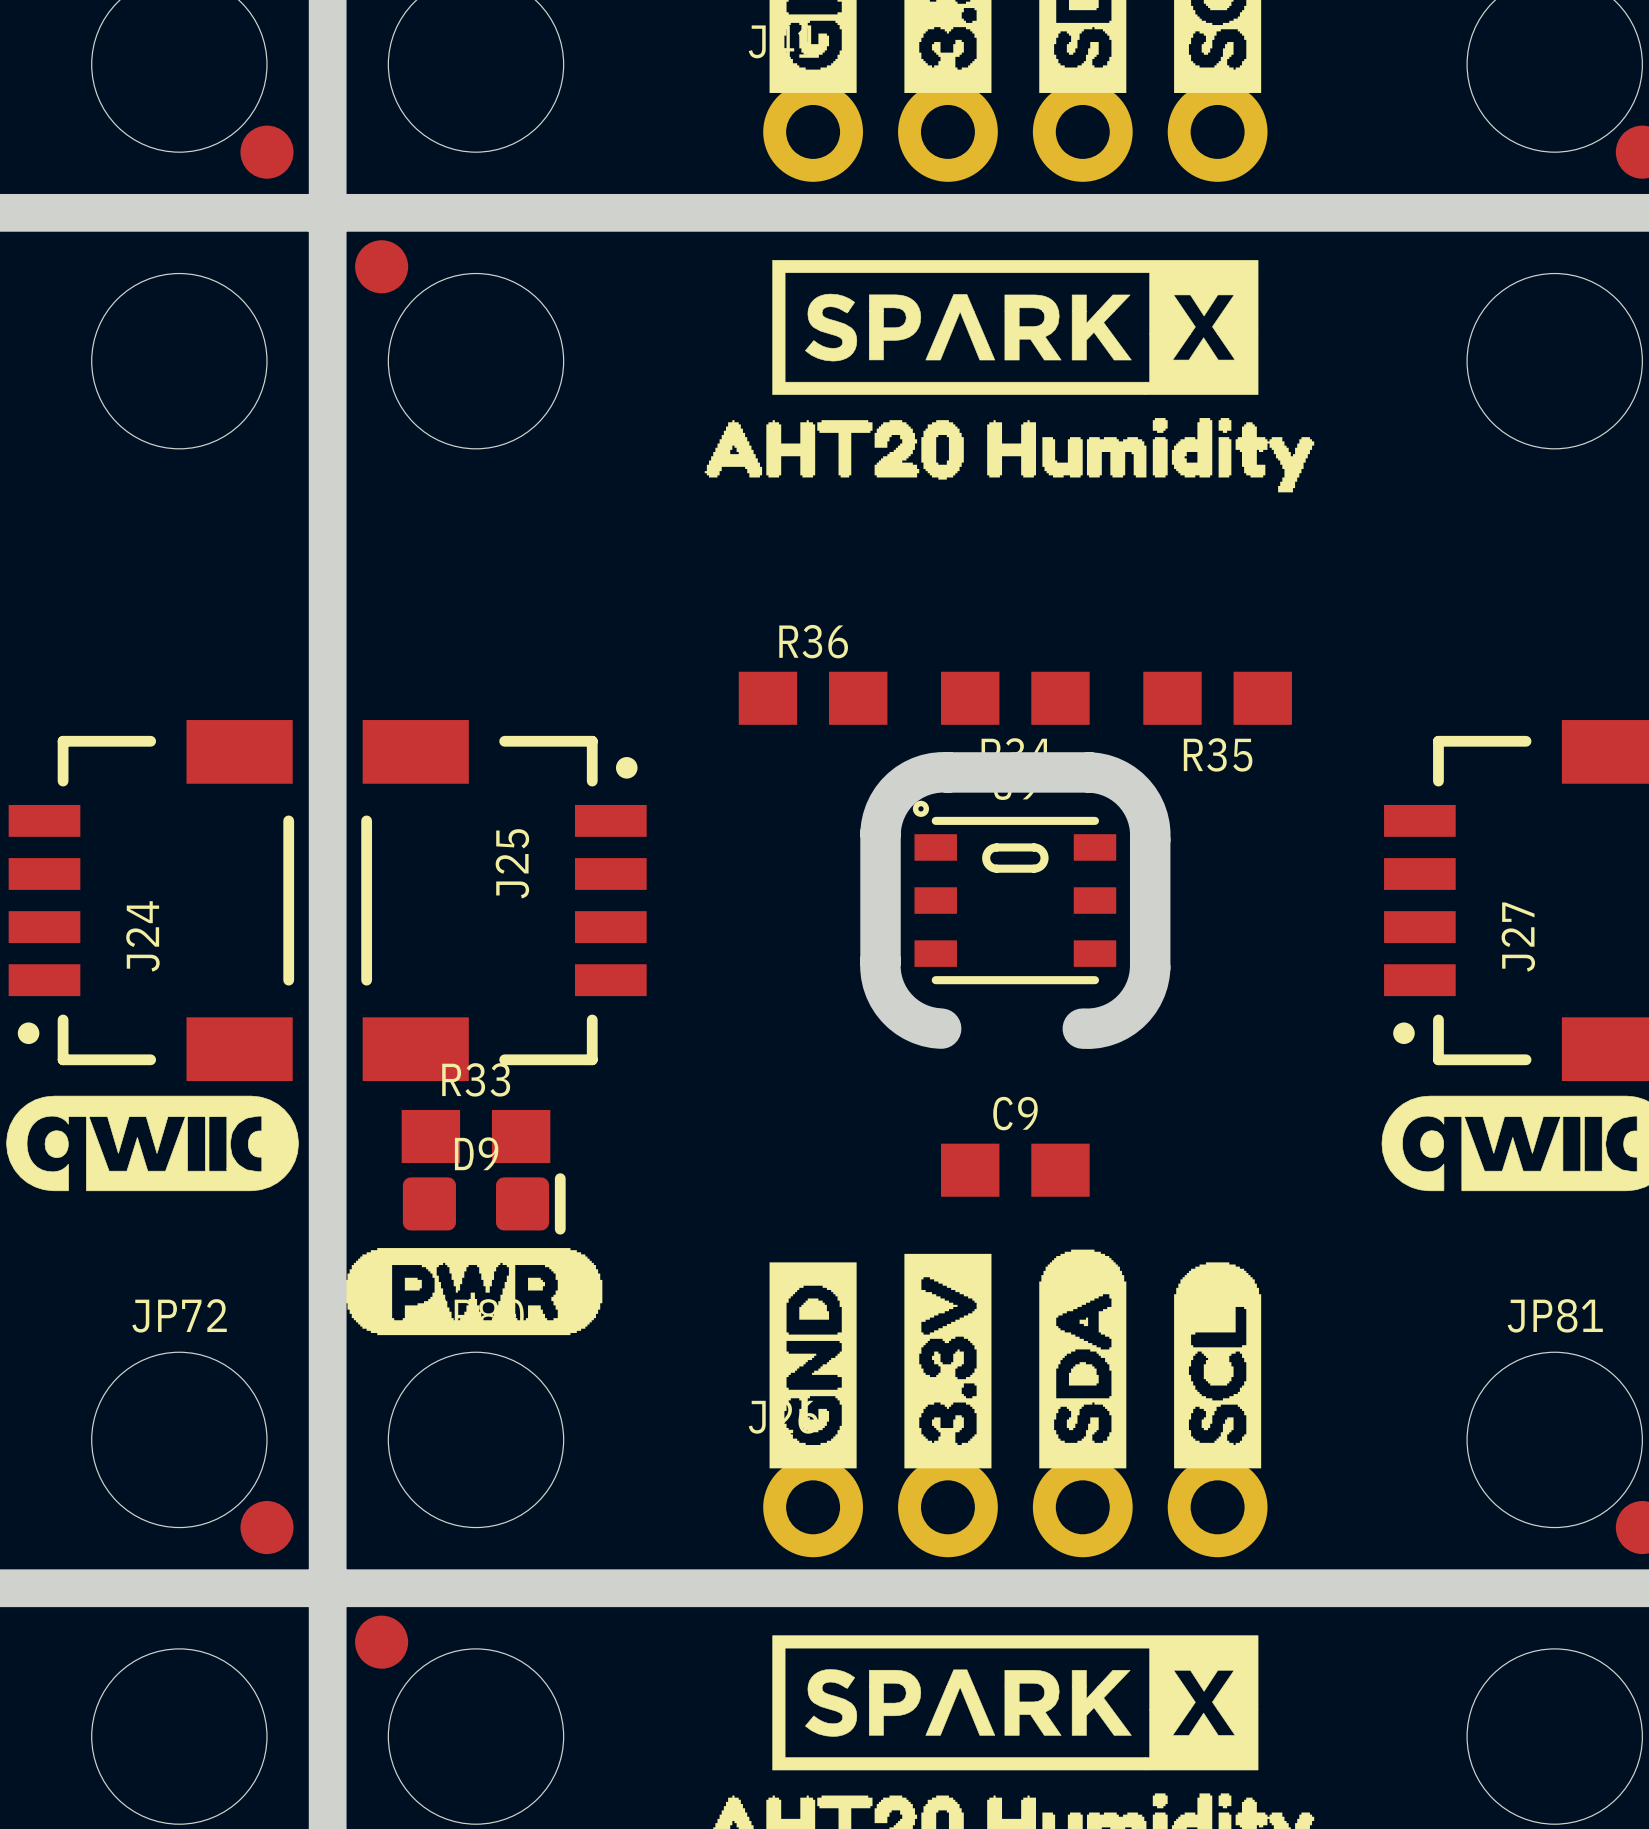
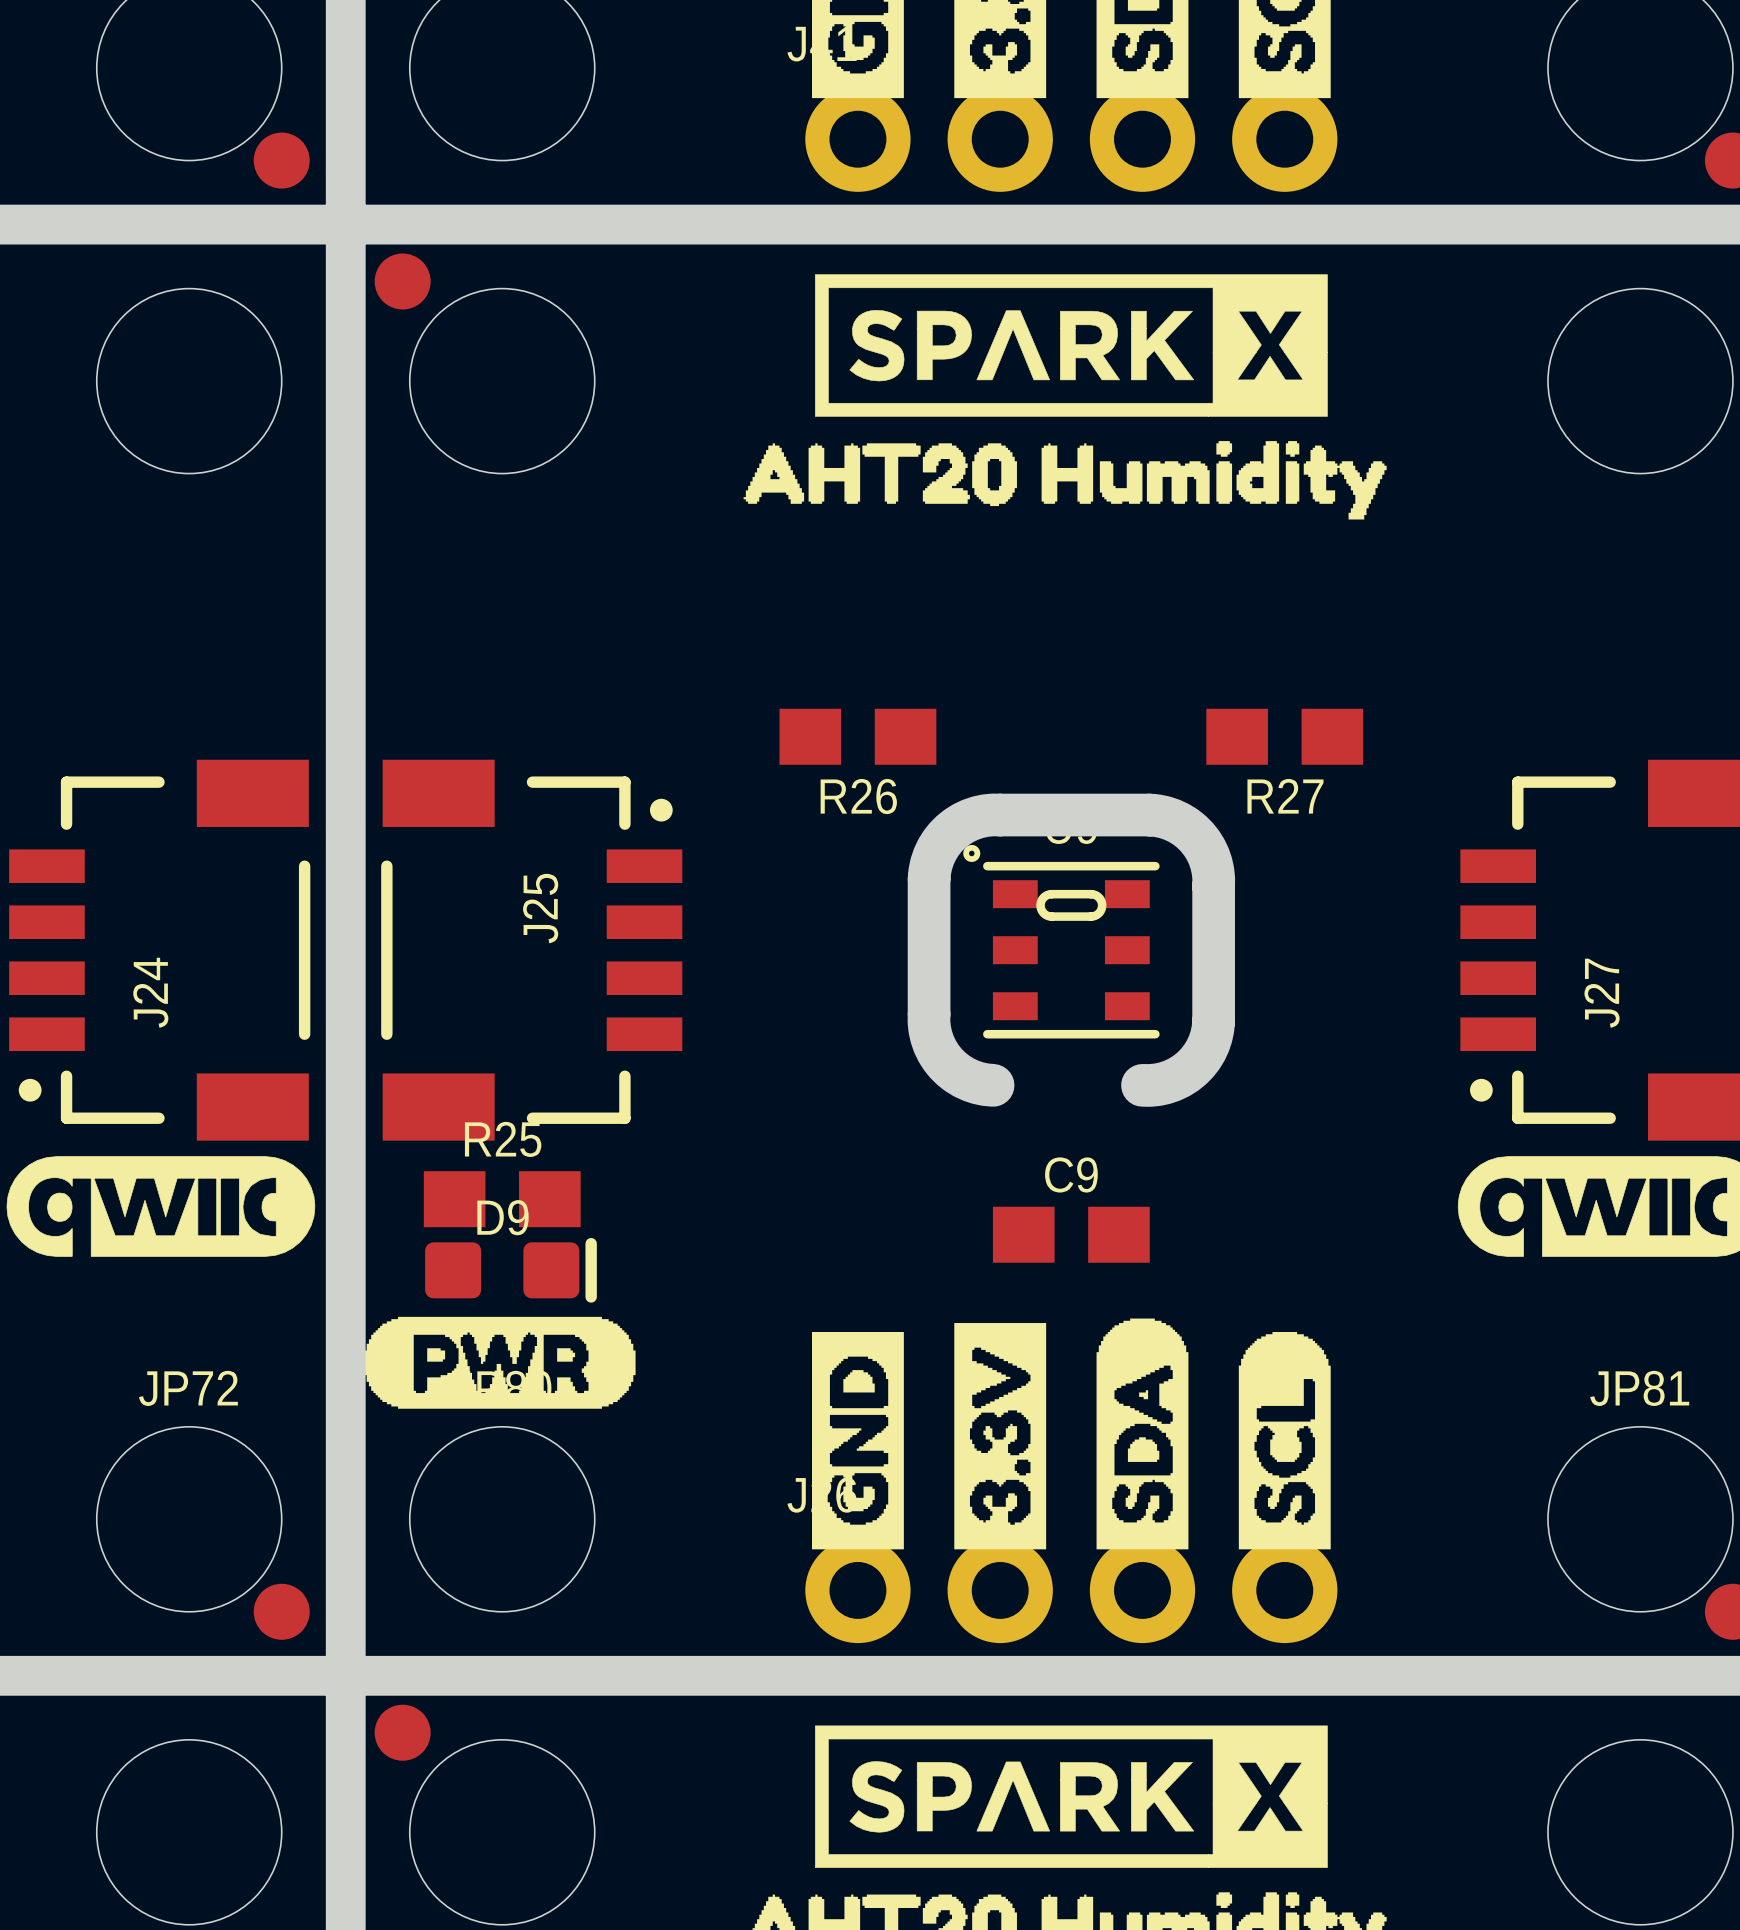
R36 name: R36 (813, 641) -> R26 (858, 796)
part: (1015, 698) -> none
R35 name: R35 (1218, 754) -> R27 (1285, 796)
part footprint: [912, 800, 1117, 985] -> [963, 844, 1160, 1039]
R33 name: R33 (476, 1079) -> R25 (503, 1139)

